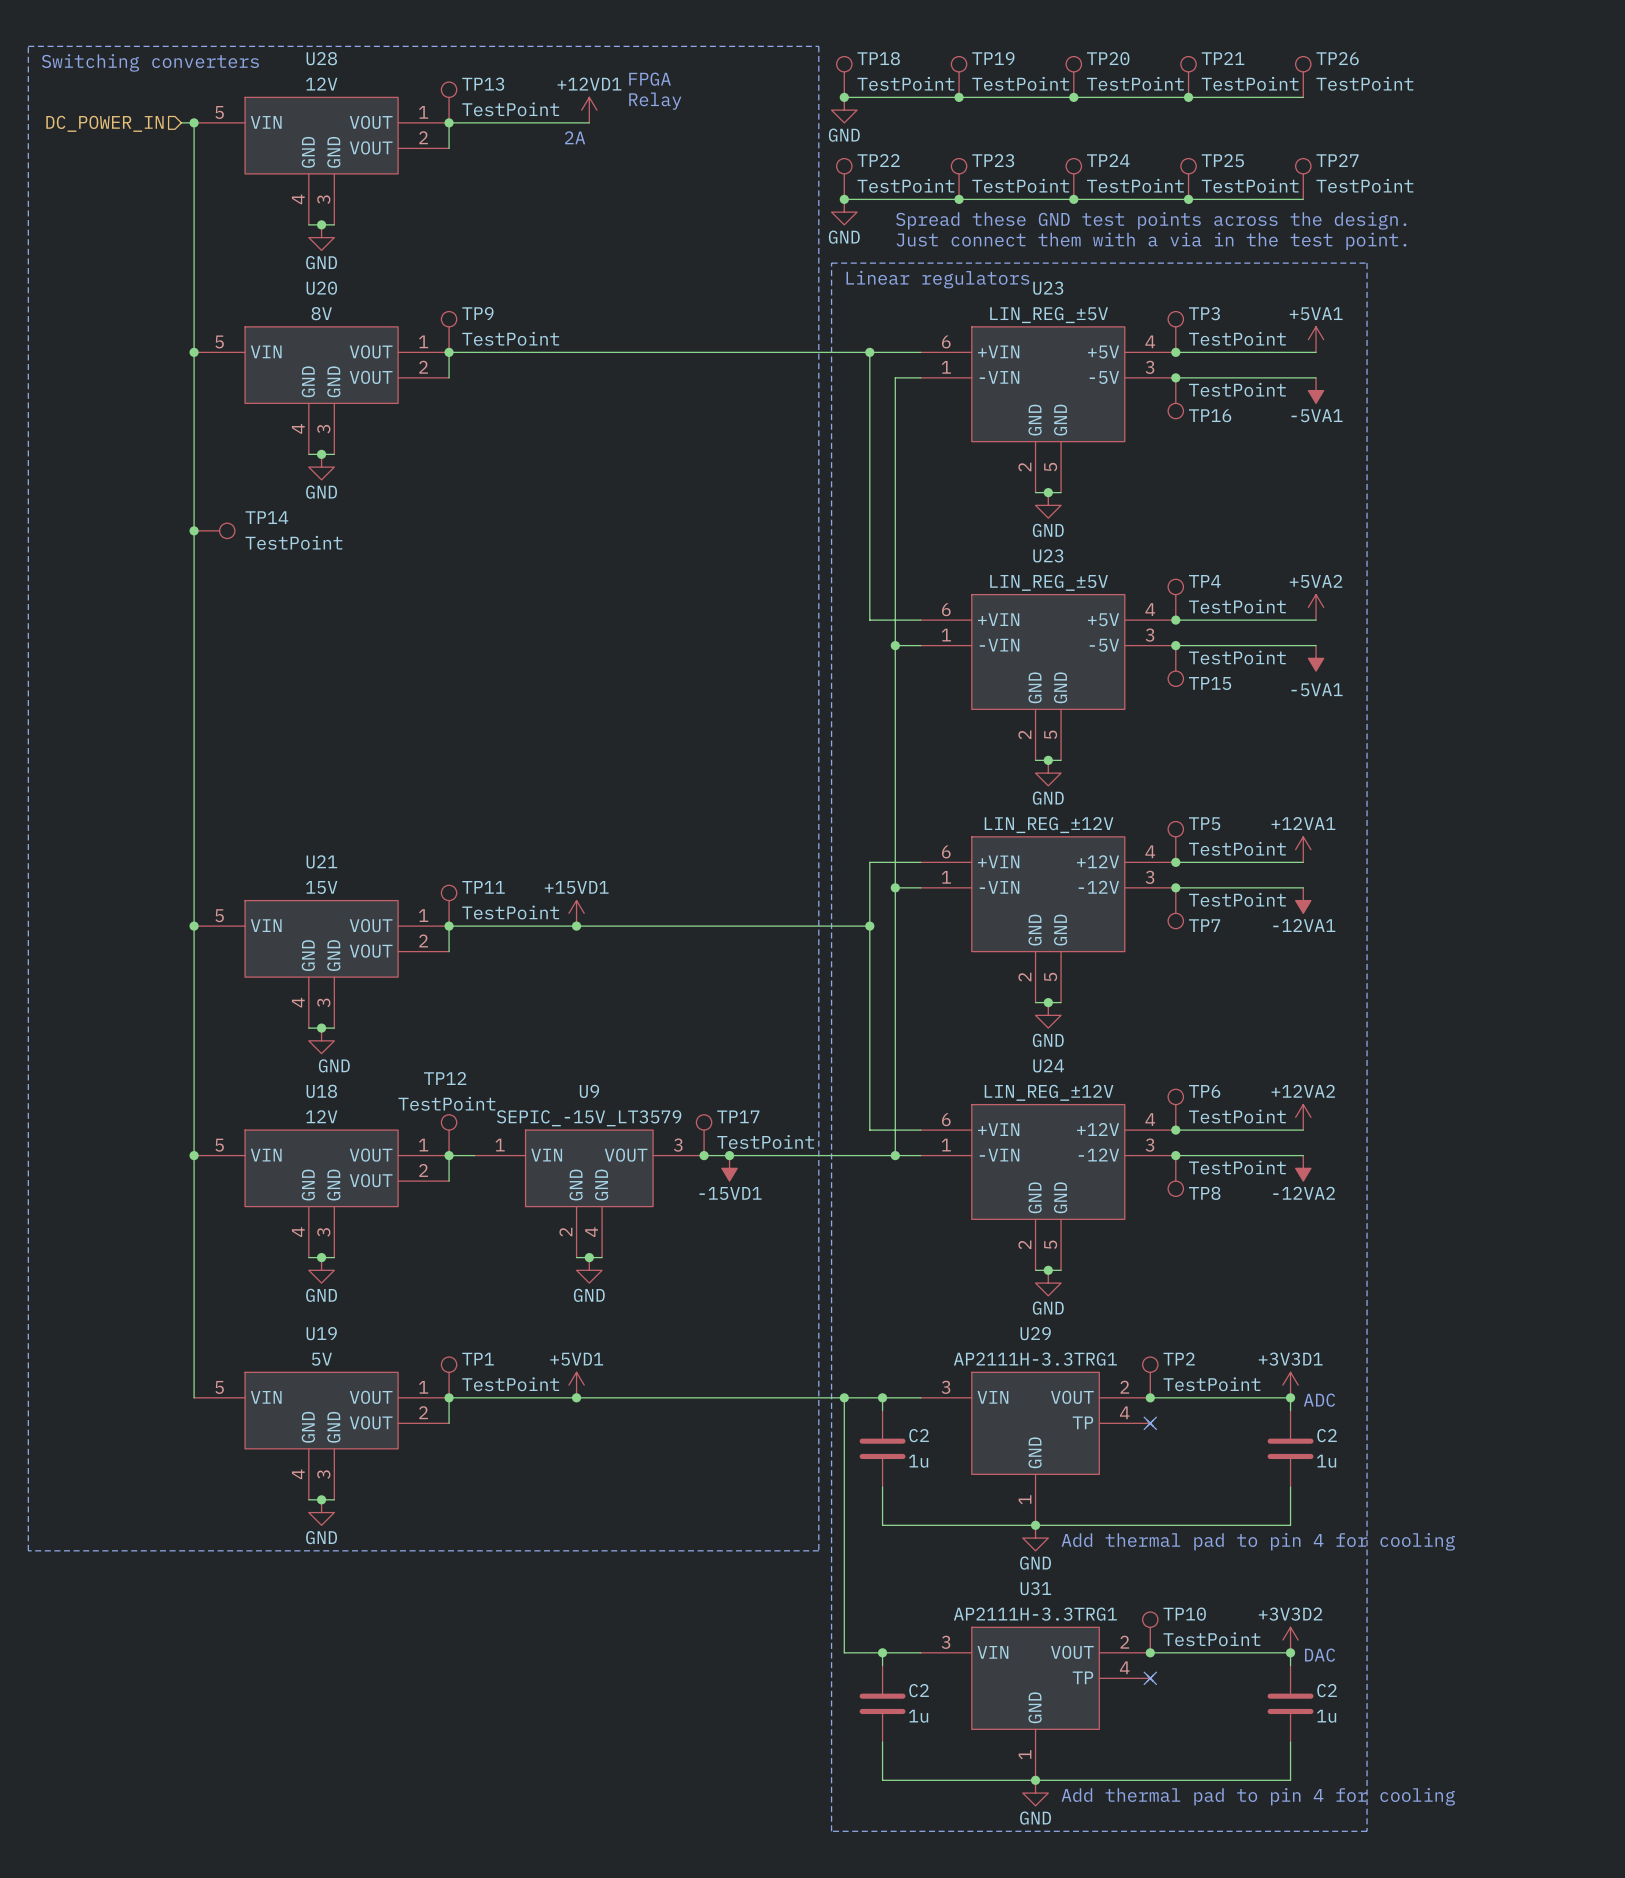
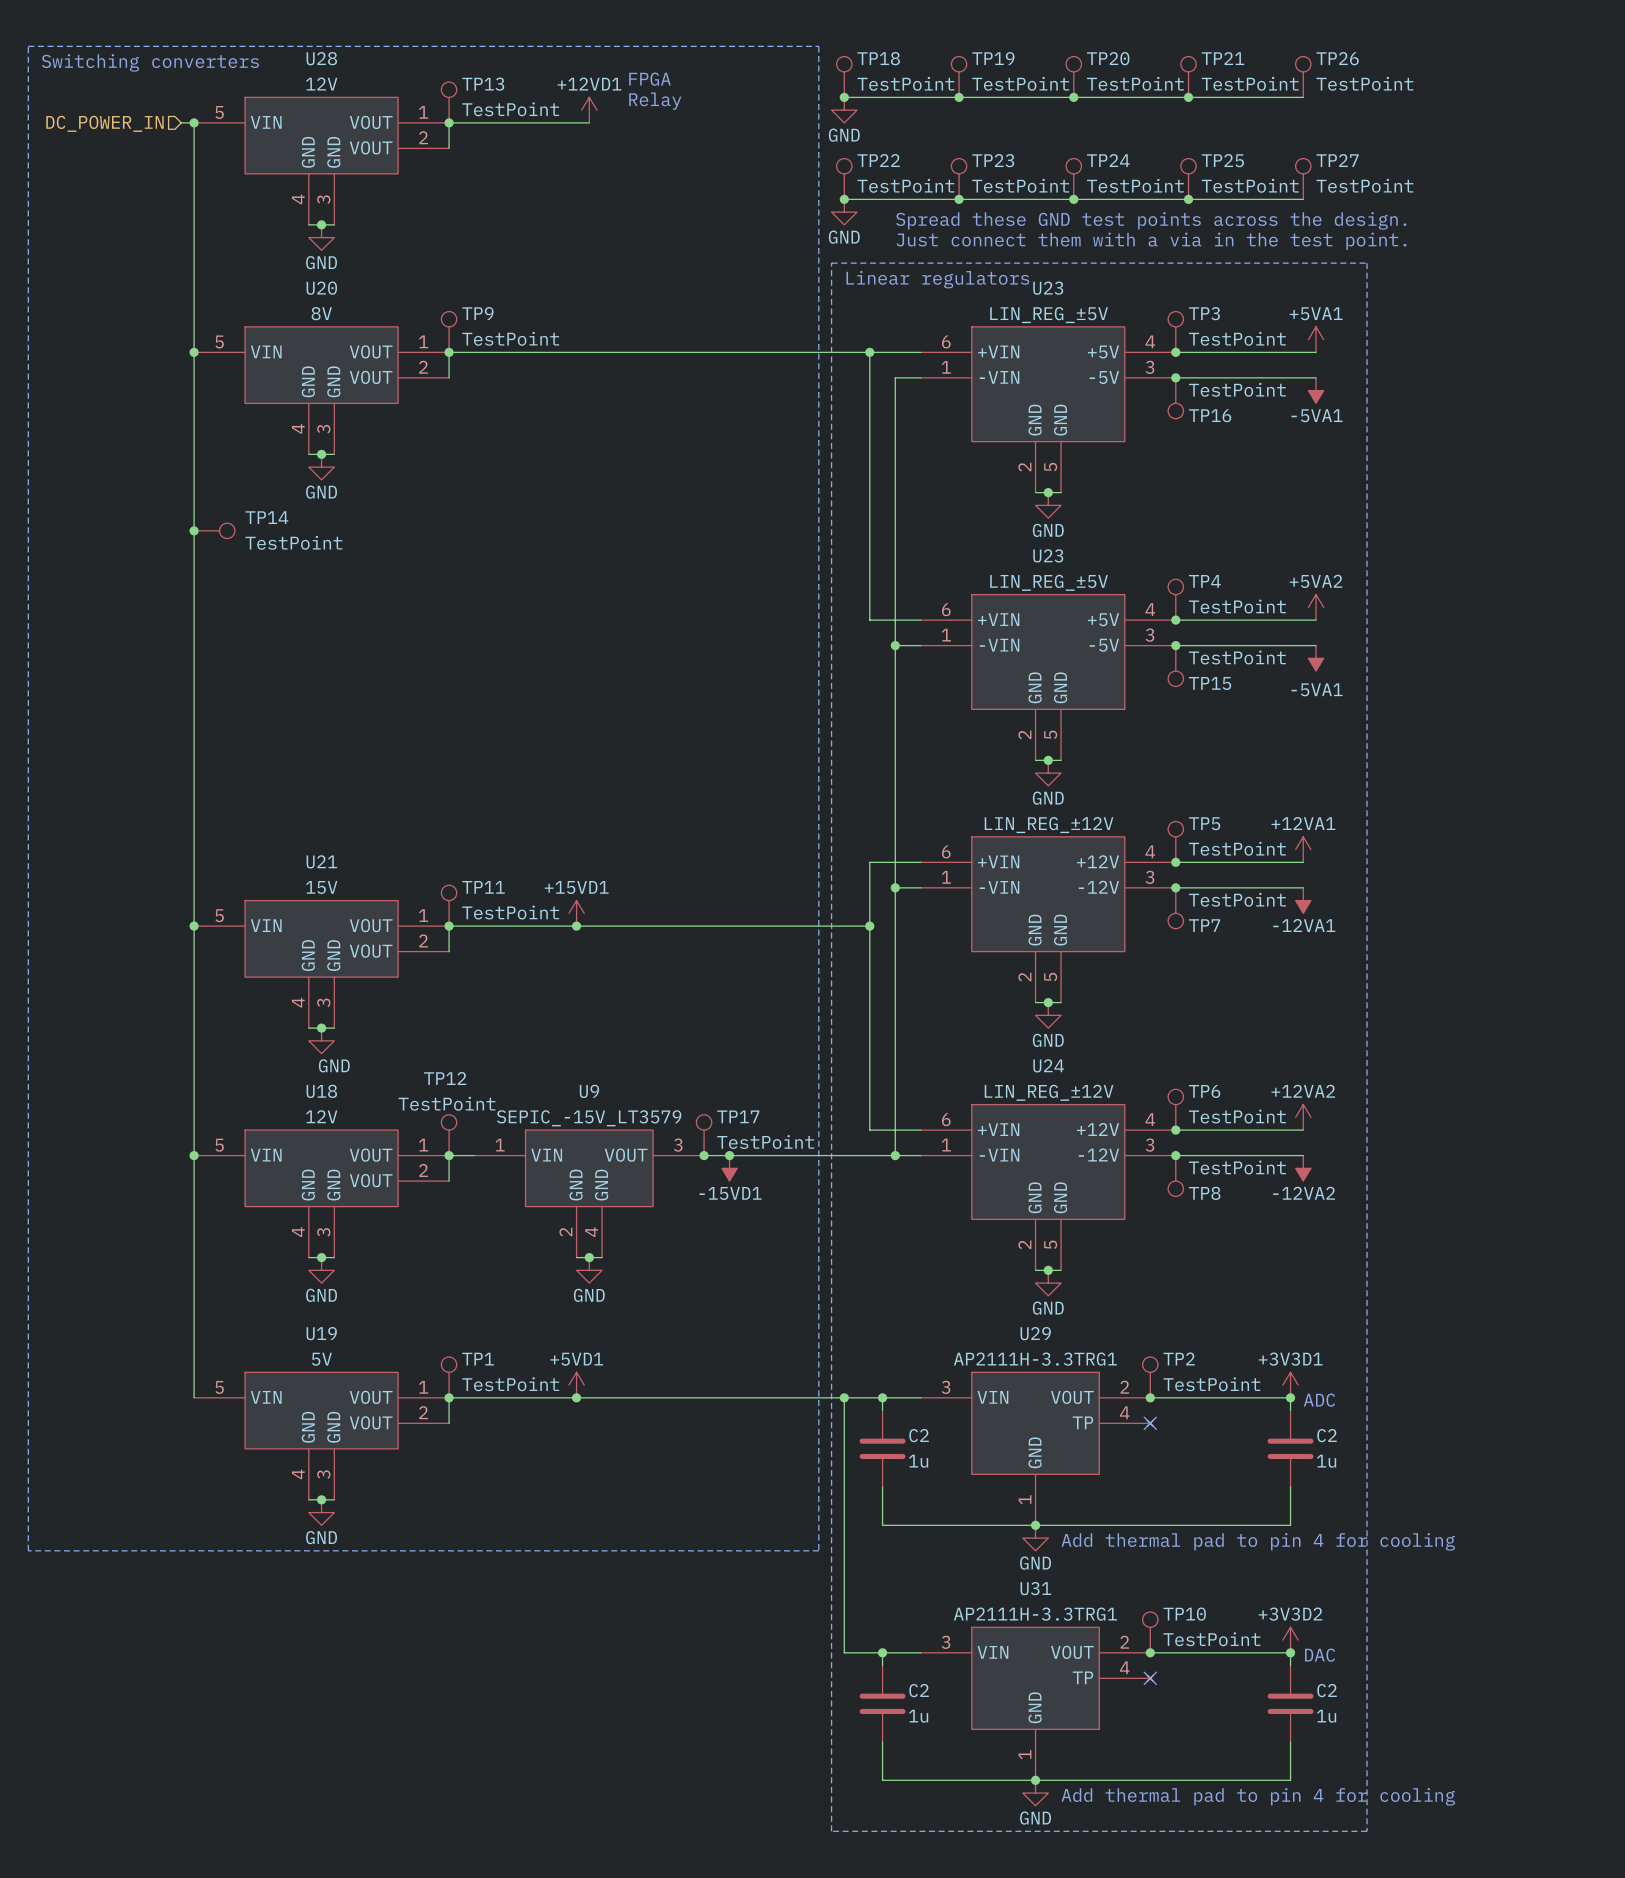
text: 2A (575, 137) -> none

